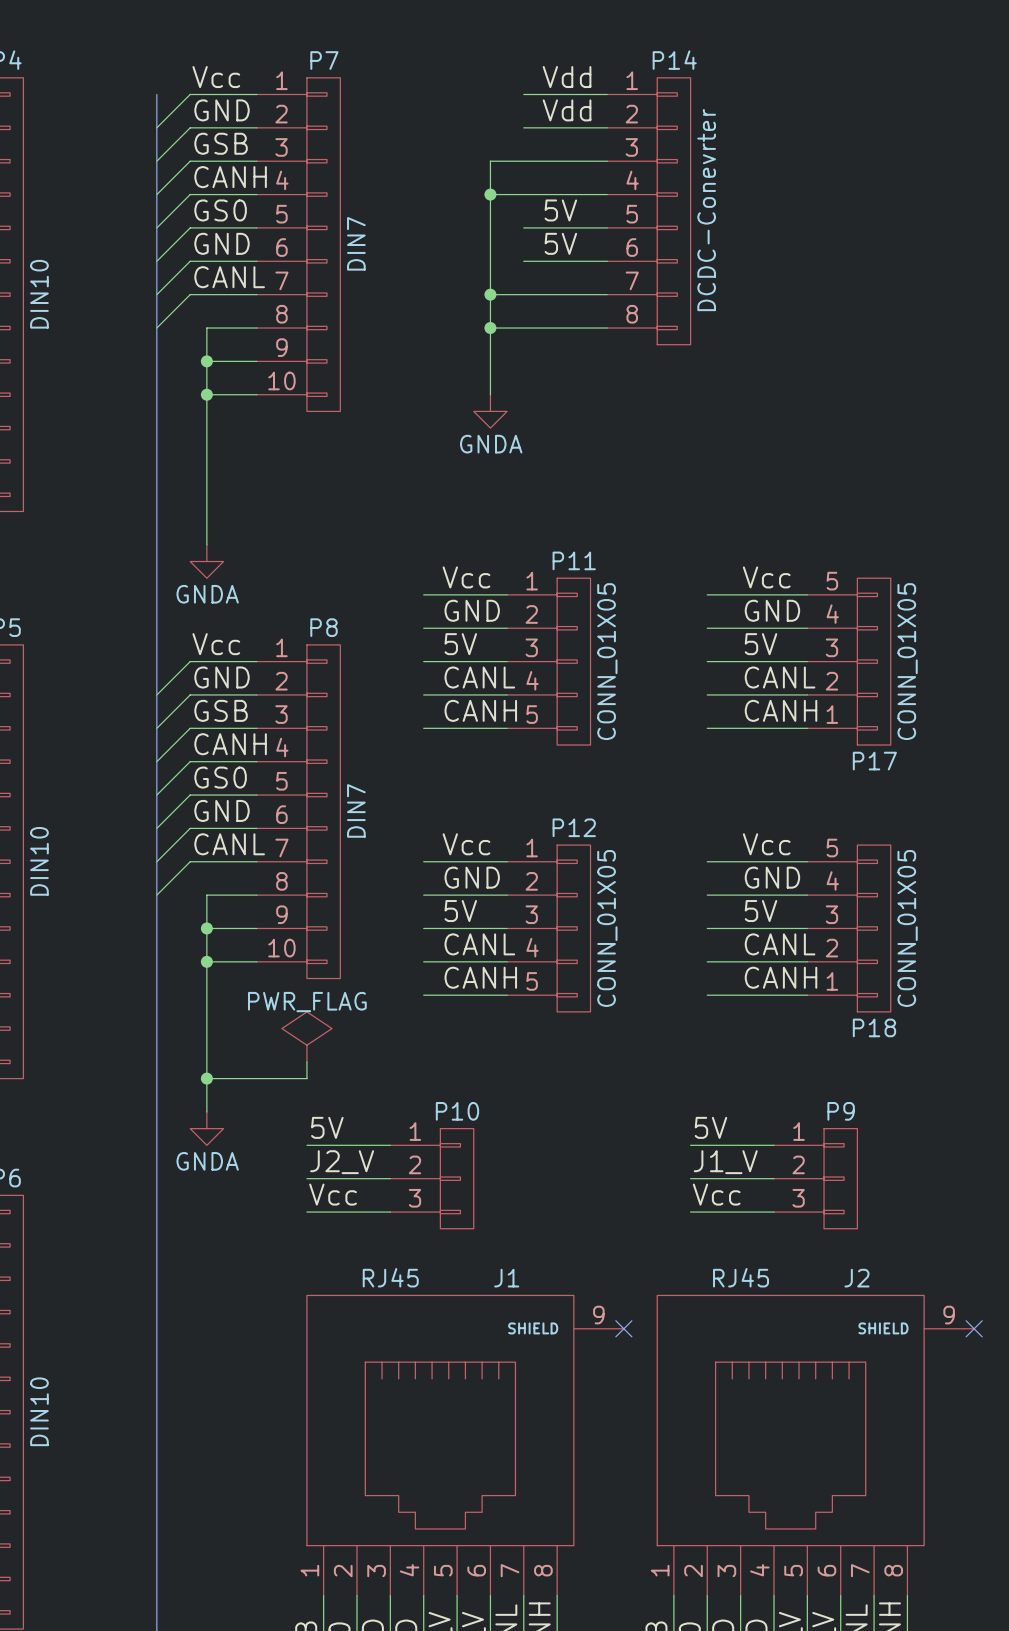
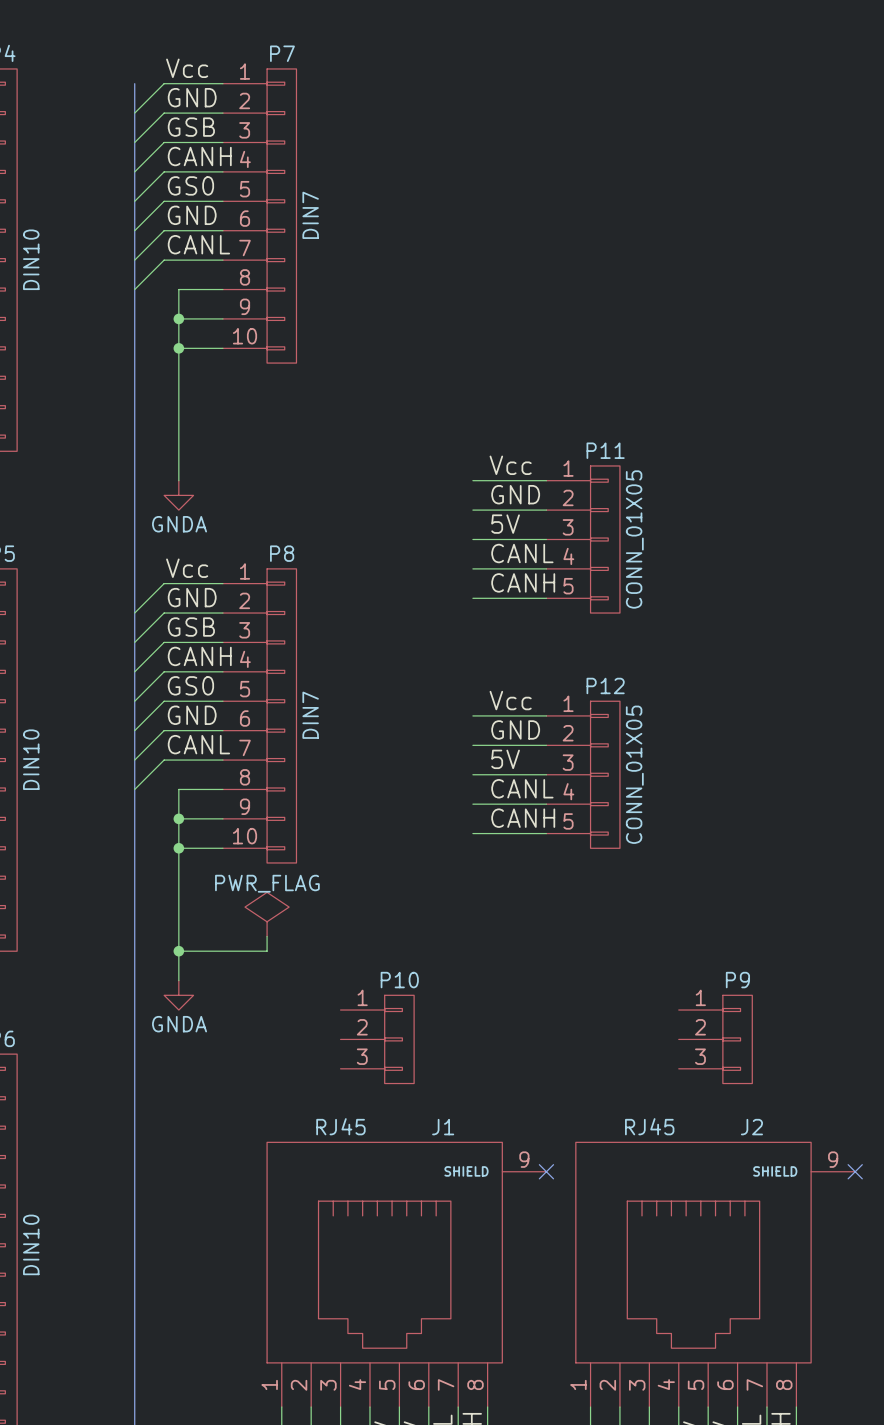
label: Vdd (567, 77) -> none
wire: (523, 94) (607, 94) -> none
label: Vdd (567, 110) -> none
wire: (523, 127) (607, 127) -> none
wire: (607, 161) (490, 161) (490, 394) -> none
wire: (490, 194) (607, 194) -> none
junction: (490, 194) -> none
label: 5V (560, 210) -> none
P14: DCDC-Conevrter (648, 211) -> none
wire: (523, 227) (607, 227) -> none
label: 5V (560, 243) -> none
wire: (523, 261) (607, 261) -> none
wire: (490, 294) (607, 294) -> none
junction: (490, 294) -> none
wire: (490, 328) (607, 328) -> none
junction: (490, 328) -> none
power symbol: GNDA (490, 411) -> none
label: none -> Vcc (510, 465)
label: none -> GND (515, 494)
label: Vcc (466, 577) -> none
label: Vcc (766, 577) -> none
wire: (423, 594) (507, 594) -> (472, 480) (546, 480)
label: none -> 5V (505, 524)
wire: (707, 594) (807, 594) -> none
label: GND (472, 610) -> none
label: GND (772, 610) -> none
label: none -> CANL (522, 553)
wire: (423, 628) (507, 628) -> (472, 510) (546, 510)
wire: (707, 628) (807, 628) -> none
label: 5V (460, 644) -> none
label: 5V (761, 644) -> none
label: none -> CANH (523, 582)
wire: (423, 661) (507, 661) -> (472, 539) (546, 539)
P11 position: (548, 661) -> (583, 539)
wire: (707, 661) (807, 661) -> none
P17: CONN_01X05 (849, 661) -> none
label: CANL (479, 677) -> none
label: CANL (780, 677) -> none
wire: (423, 694) (507, 694) -> (472, 568) (546, 568)
wire: (707, 694) (807, 694) -> none
label: CANH (480, 710) -> none
label: CANH (781, 710) -> none
wire: (423, 728) (507, 728) -> (472, 598) (546, 598)
wire: (707, 728) (807, 728) -> none
label: none -> Vcc (510, 700)
label: none -> GND (515, 729)
label: Vcc (466, 844) -> none
label: Vcc (766, 844) -> none
label: none -> 5V (505, 759)
wire: (423, 861) (507, 861) -> (472, 715) (546, 715)
wire: (707, 861) (807, 861) -> none
label: GND (472, 877) -> none
label: GND (772, 877) -> none
label: none -> CANL (522, 788)
wire: (423, 895) (507, 895) -> (472, 745) (546, 745)
wire: (707, 895) (807, 895) -> none
label: 5V (460, 911) -> none
label: 5V (761, 911) -> none
label: none -> CANH (523, 818)
wire: (423, 928) (507, 928) -> (472, 774) (546, 774)
P12 position: (548, 928) -> (583, 774)
wire: (707, 928) (807, 928) -> none
P18: CONN_01X05 (849, 928) -> none
label: CANL (479, 944) -> none
label: CANL (780, 944) -> none
wire: (423, 961) (507, 961) -> (472, 804) (546, 804)
wire: (707, 961) (807, 961) -> none
label: CANH (480, 977) -> none
label: CANH (781, 977) -> none
wire: (423, 995) (507, 995) -> (472, 833) (546, 833)
wire: (707, 995) (807, 995) -> none
label: 5V (327, 1127) -> none
label: 5V (710, 1127) -> none
wire: (306, 1145) (390, 1145) -> none
wire: (690, 1145) (773, 1145) -> none
label: J2_V (342, 1162) -> none
label: J1_V (725, 1162) -> none
wire: (306, 1178) (390, 1178) -> none
wire: (690, 1178) (773, 1178) -> none
label: Vcc (333, 1194) -> none
label: Vcc (716, 1194) -> none
wire: (306, 1212) (390, 1212) -> none
wire: (690, 1212) (773, 1212) -> none

